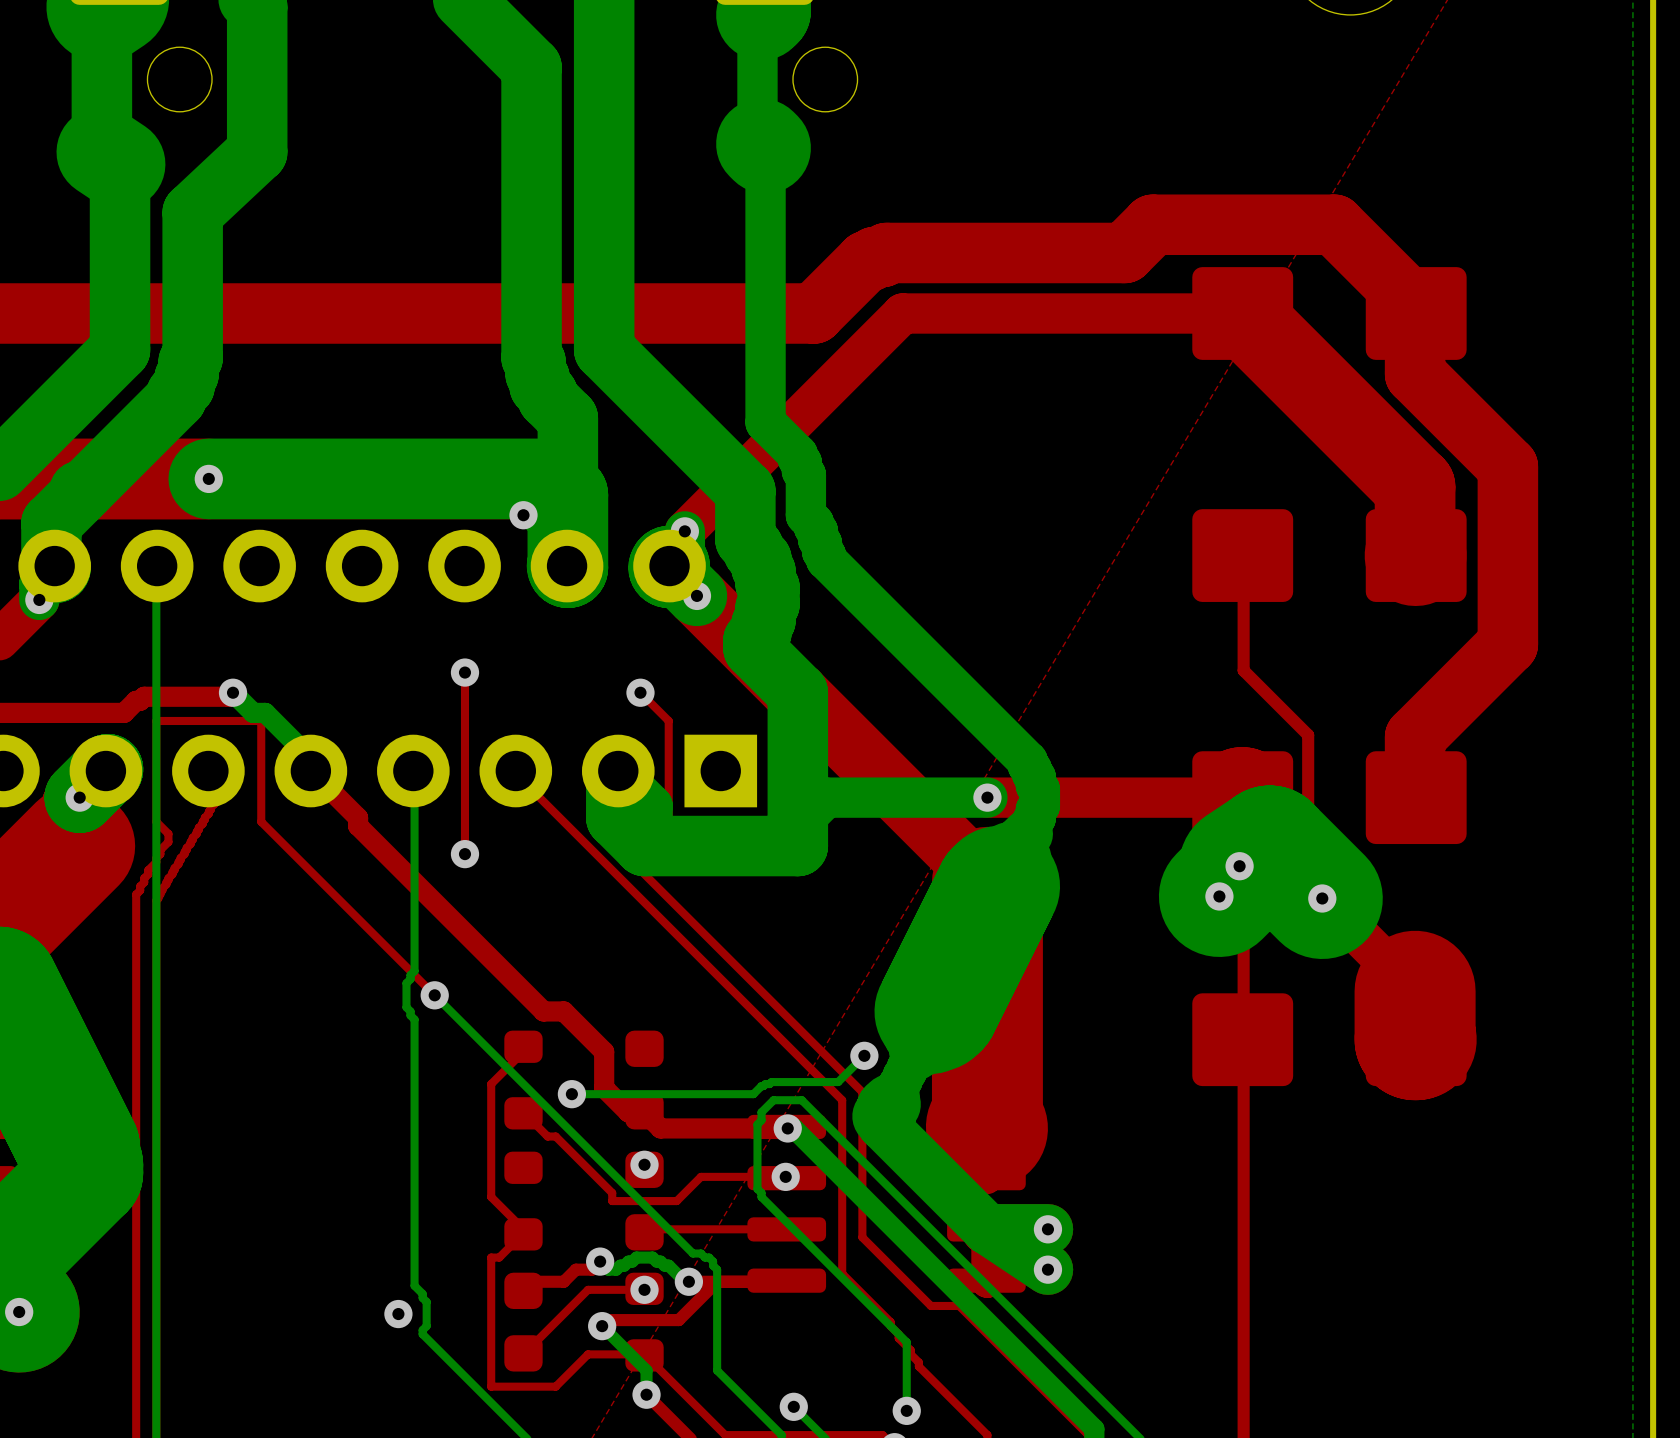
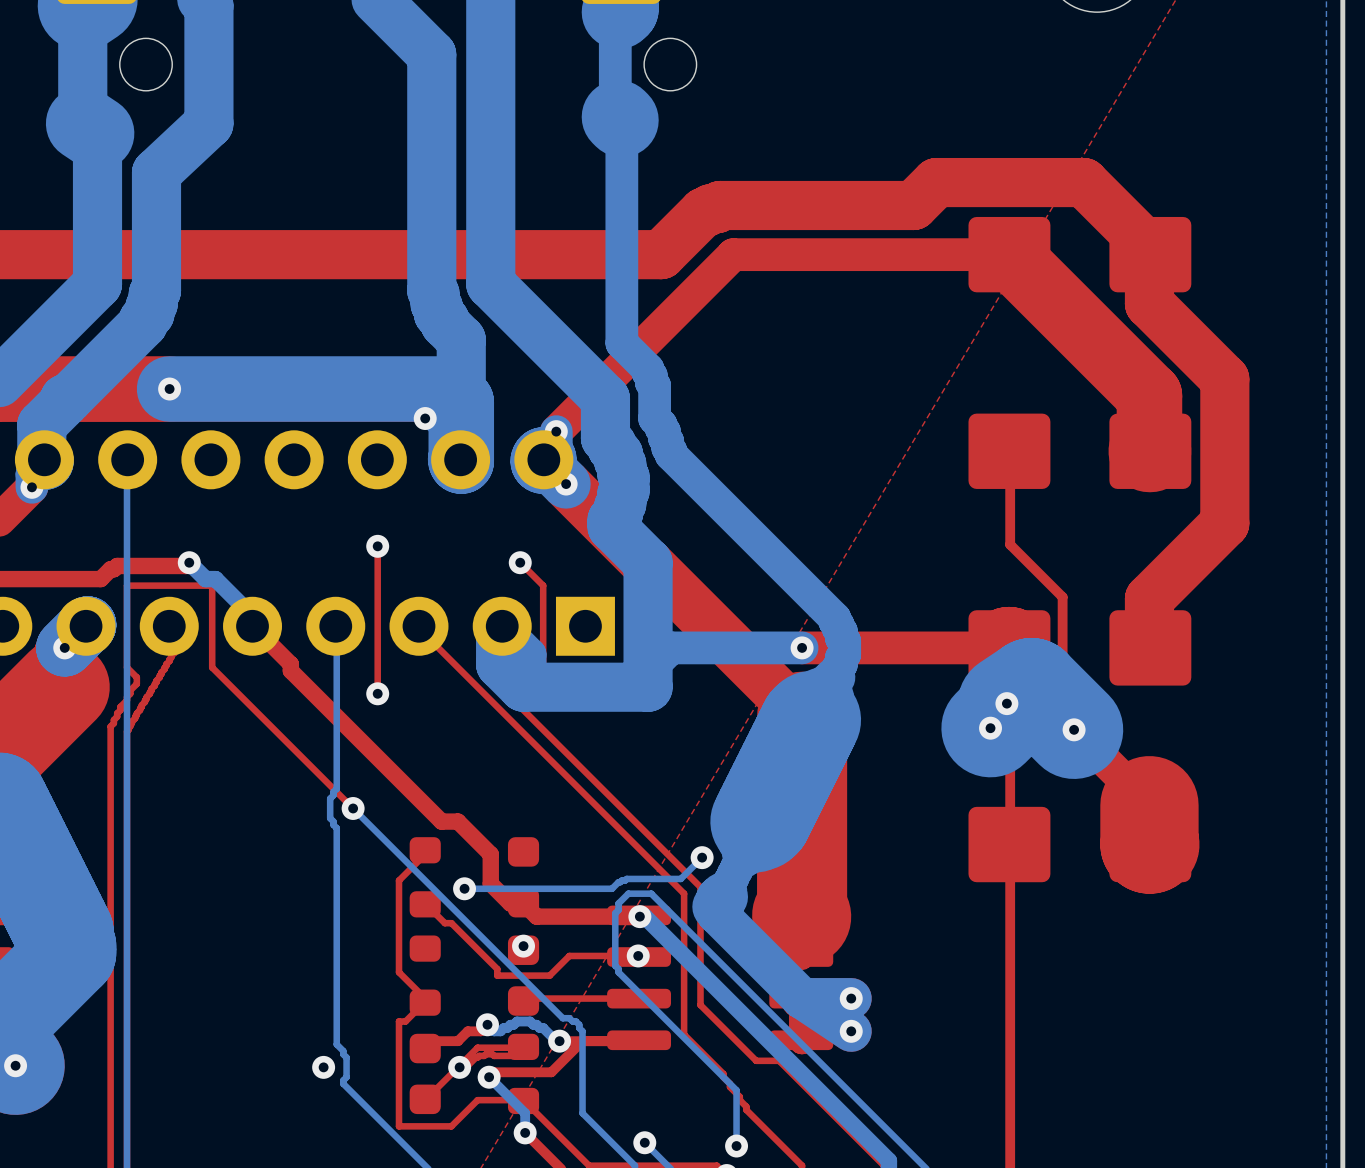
top track: none -> (523, 1047) (515, 1055) (485, 1054) (476, 1057) (466, 1067) (459, 1067)
via position: (644, 1289) -> (459, 1067)

